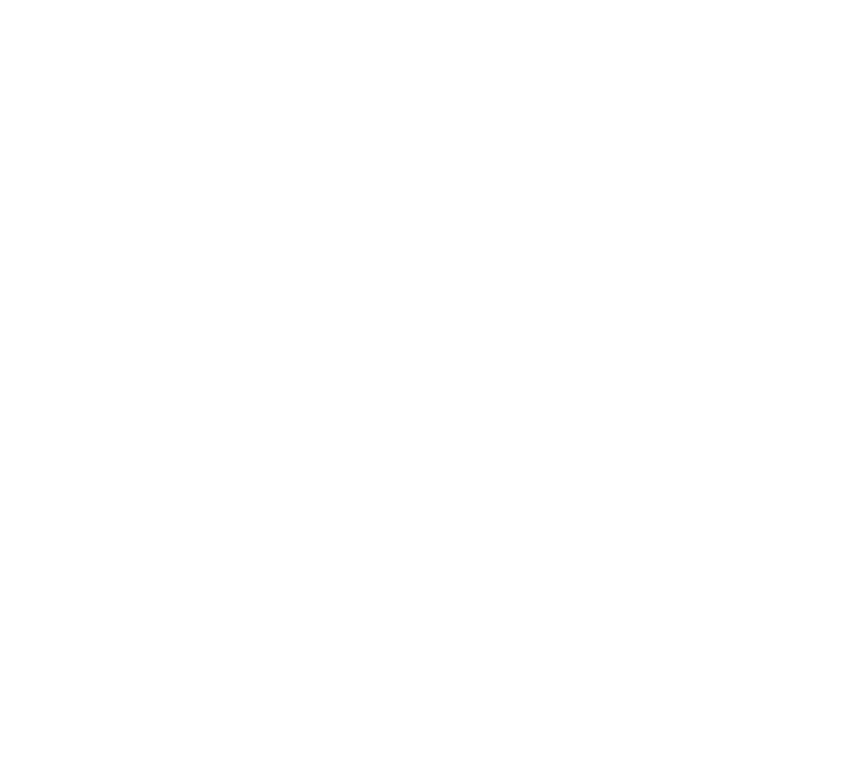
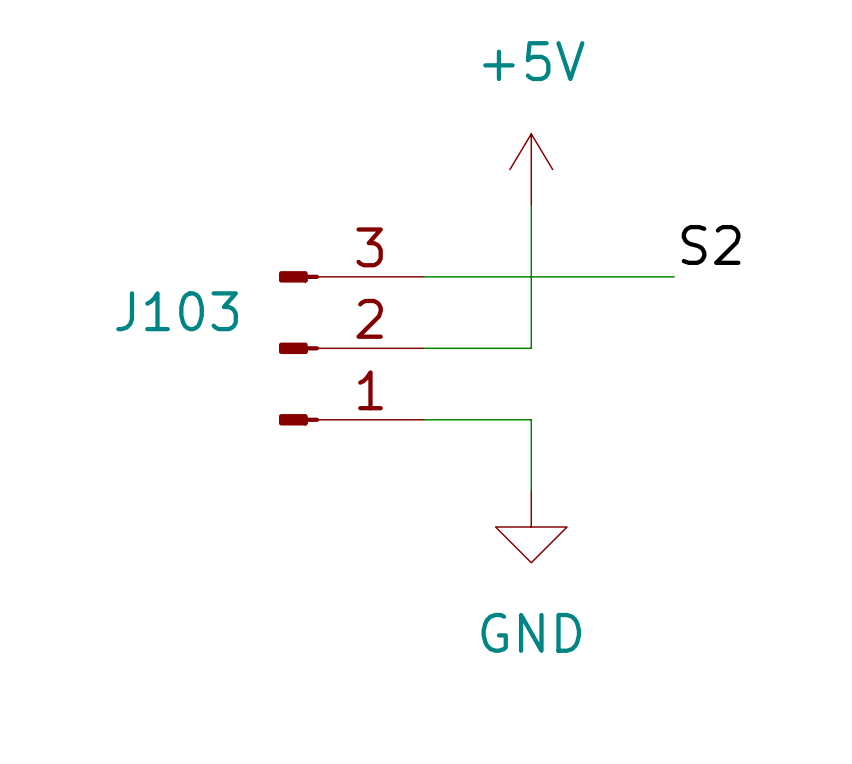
power symbol: none -> +5V (531, 169)
wire: none -> (531, 205) (531, 348) (424, 348)
label: none -> S2 (711, 244)
wire: none -> (424, 276) (674, 276)
J103: none -> (351, 348)
wire: none -> (424, 419) (531, 419) (531, 491)
power symbol: none -> GND (531, 526)

